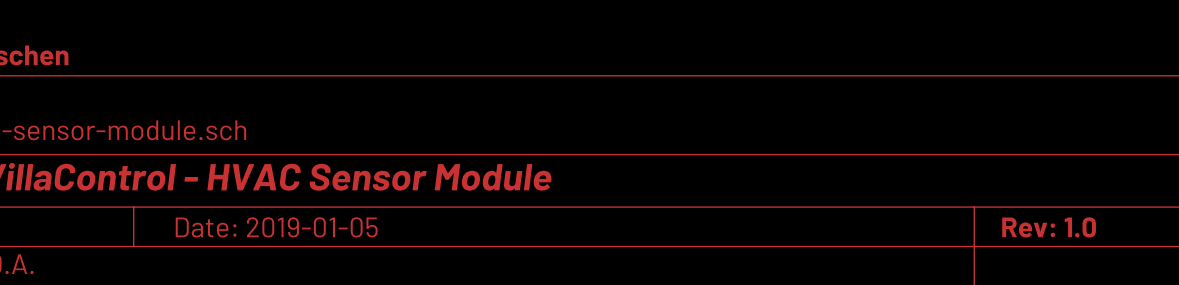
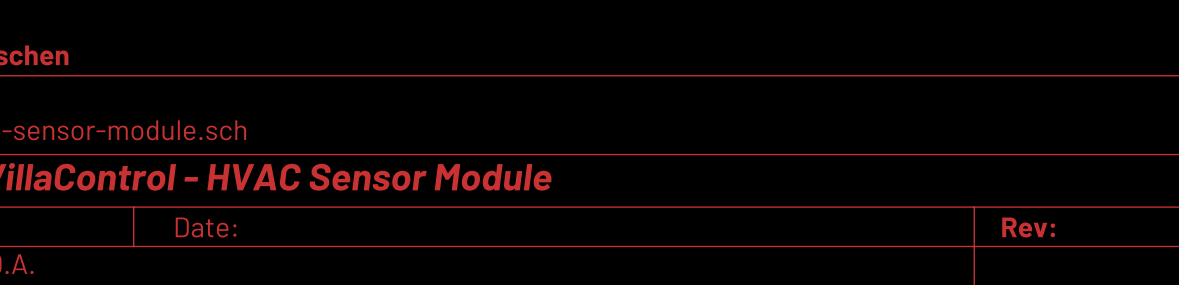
title block: Date: 2019-01-05 (276, 227) -> Date: (206, 227)
title block: Rev: 1.0 (1049, 227) -> Rev: (1028, 227)

